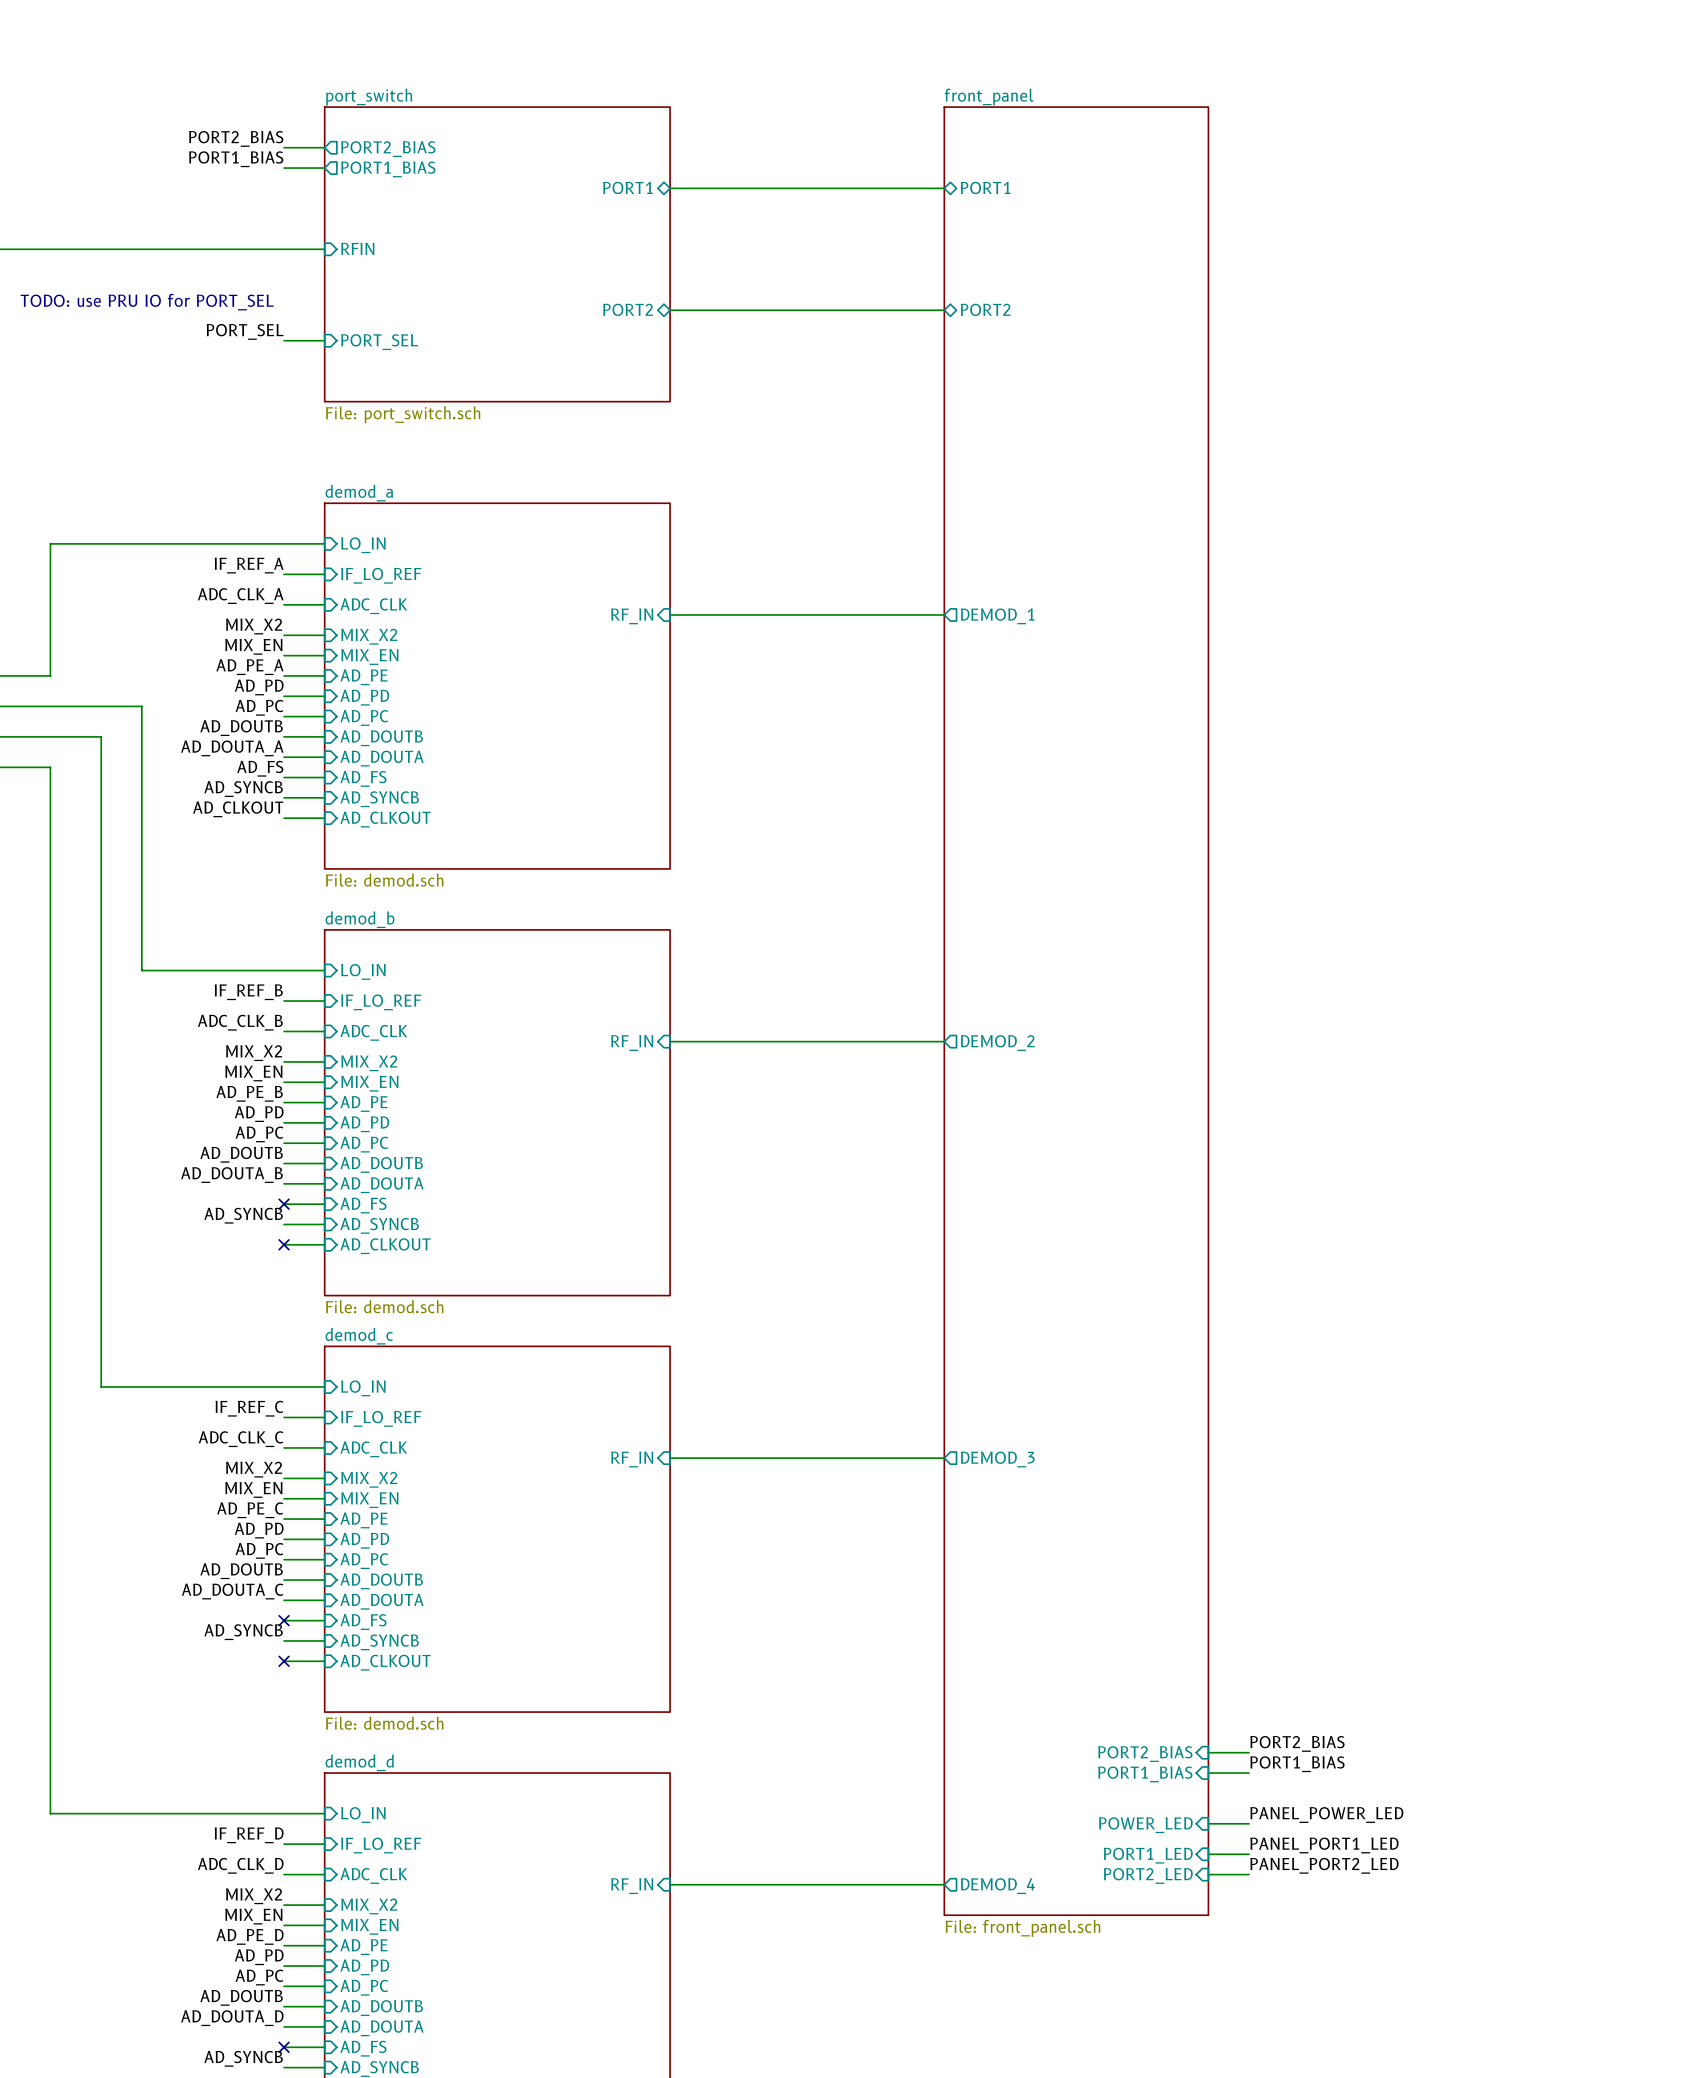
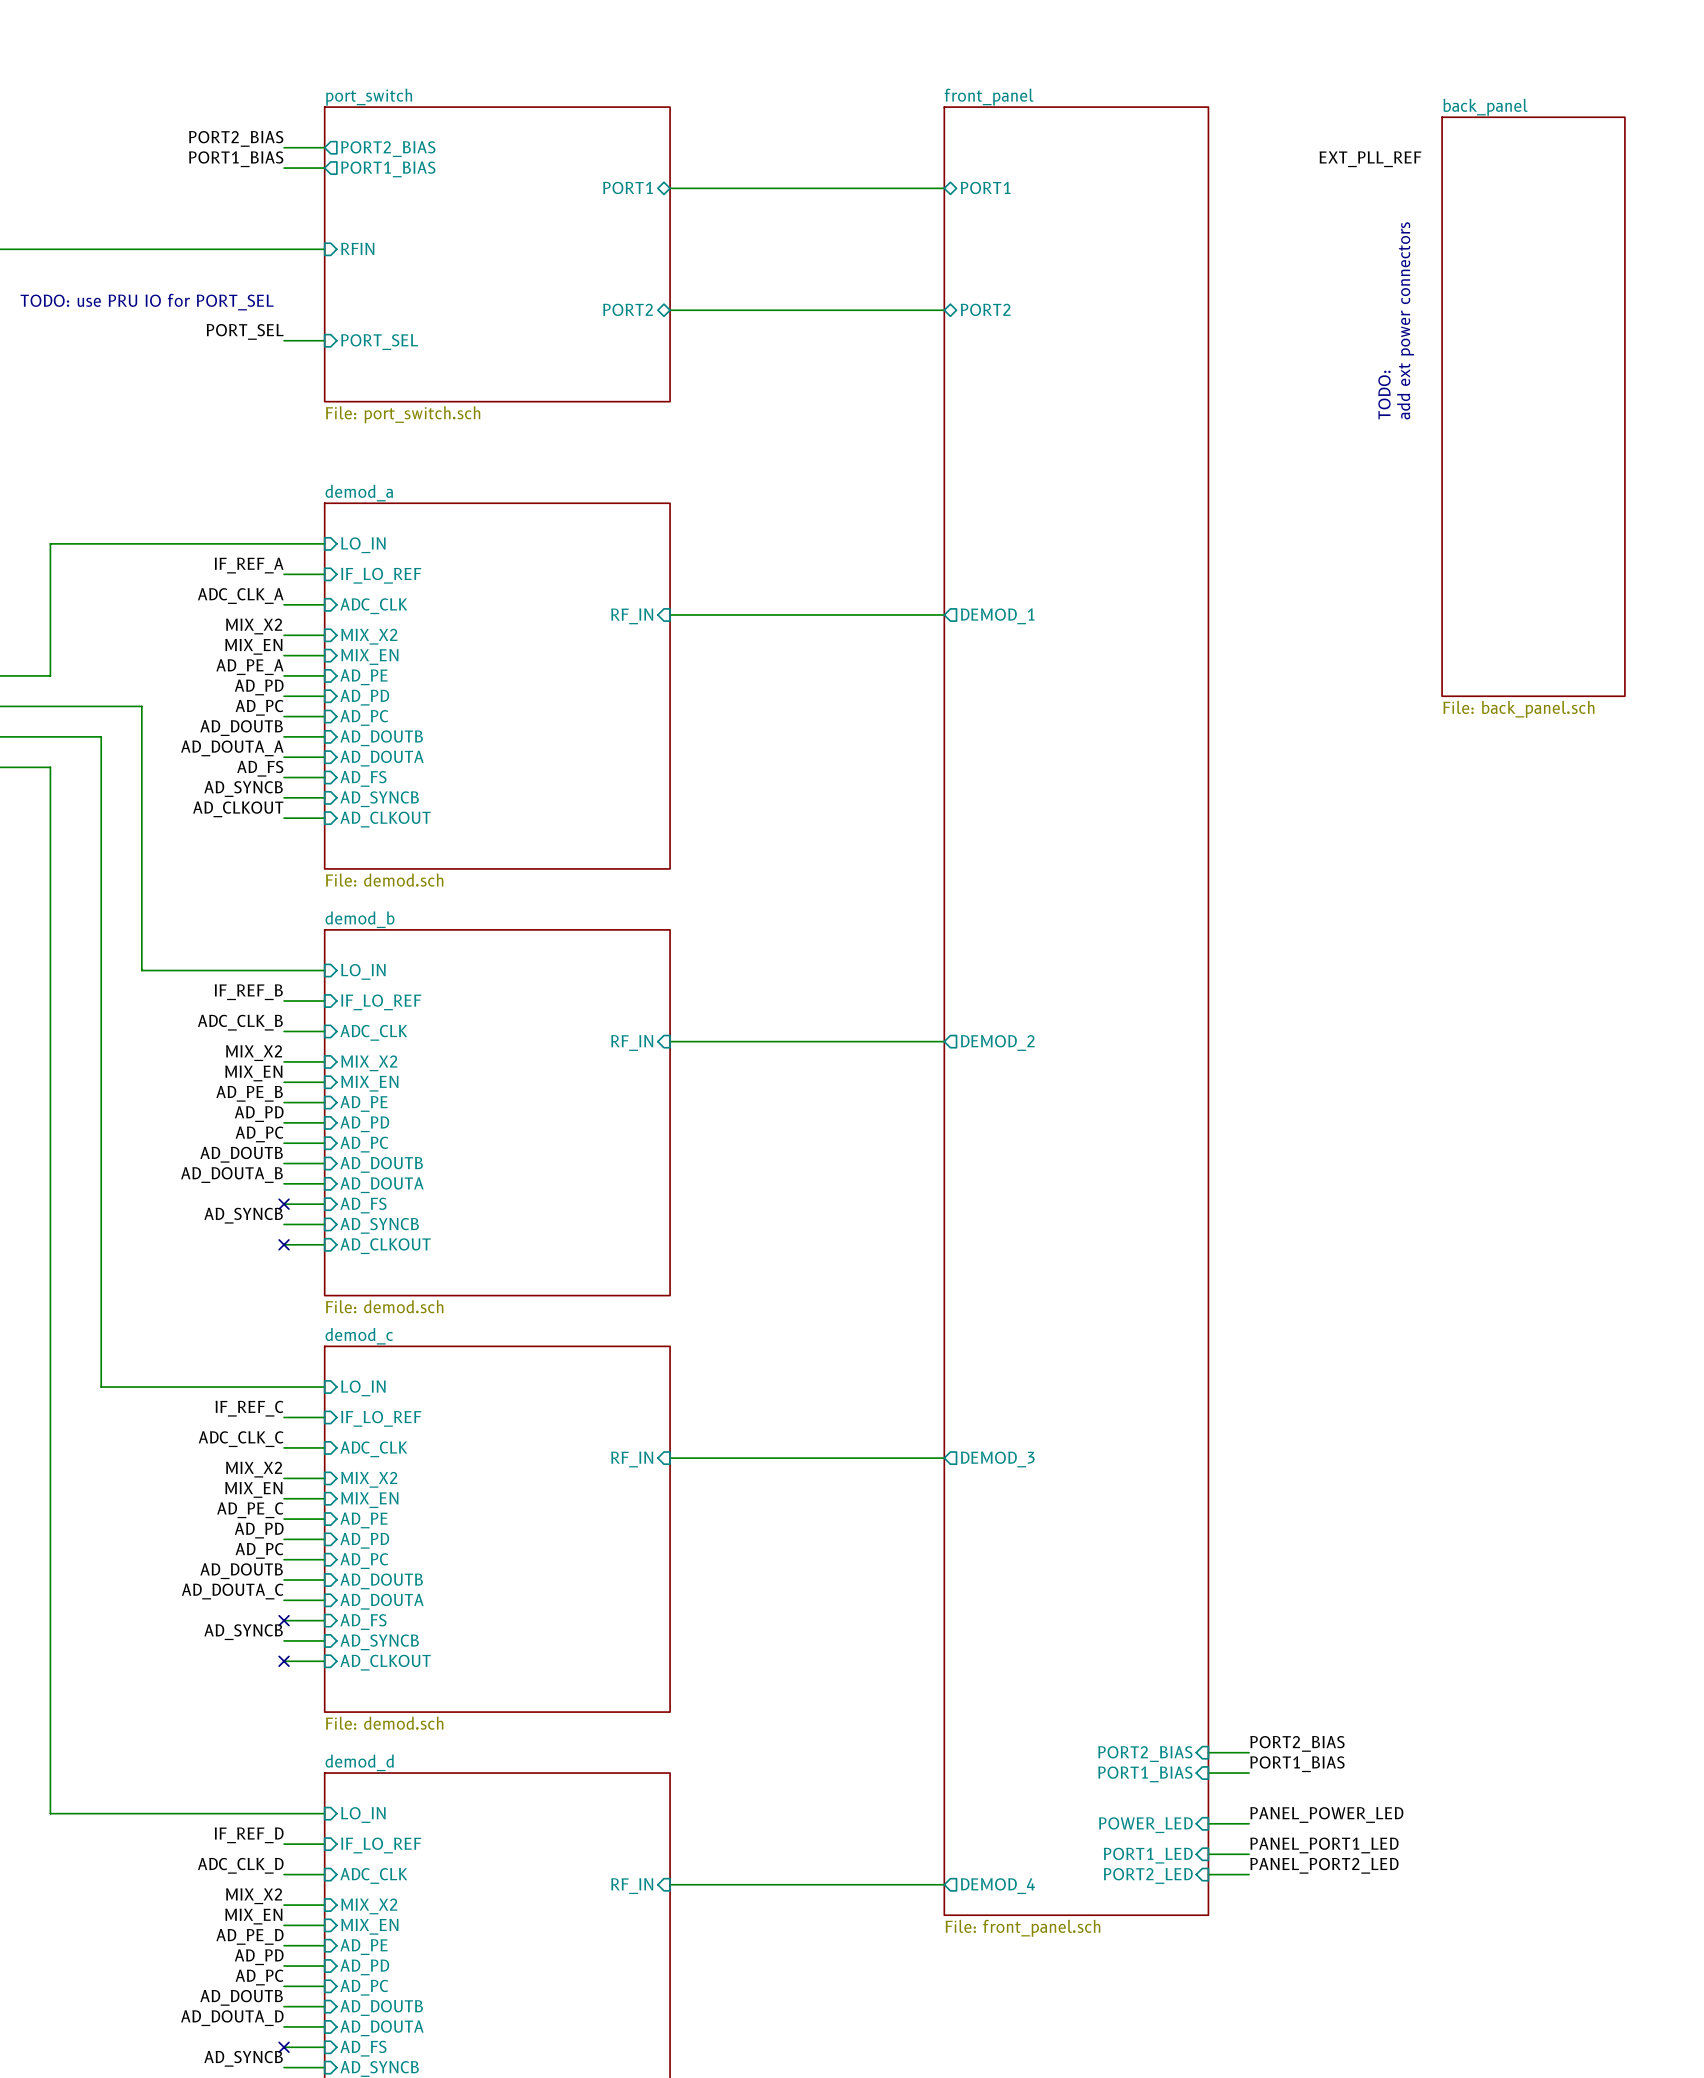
label: none -> EXT_PLL_REF (1370, 159)
text: none -> add ext power connectors (1405, 320)
text: none -> TODO: (1384, 395)
sheet back_panel: none -> File: back_panel.sch (1533, 406)

